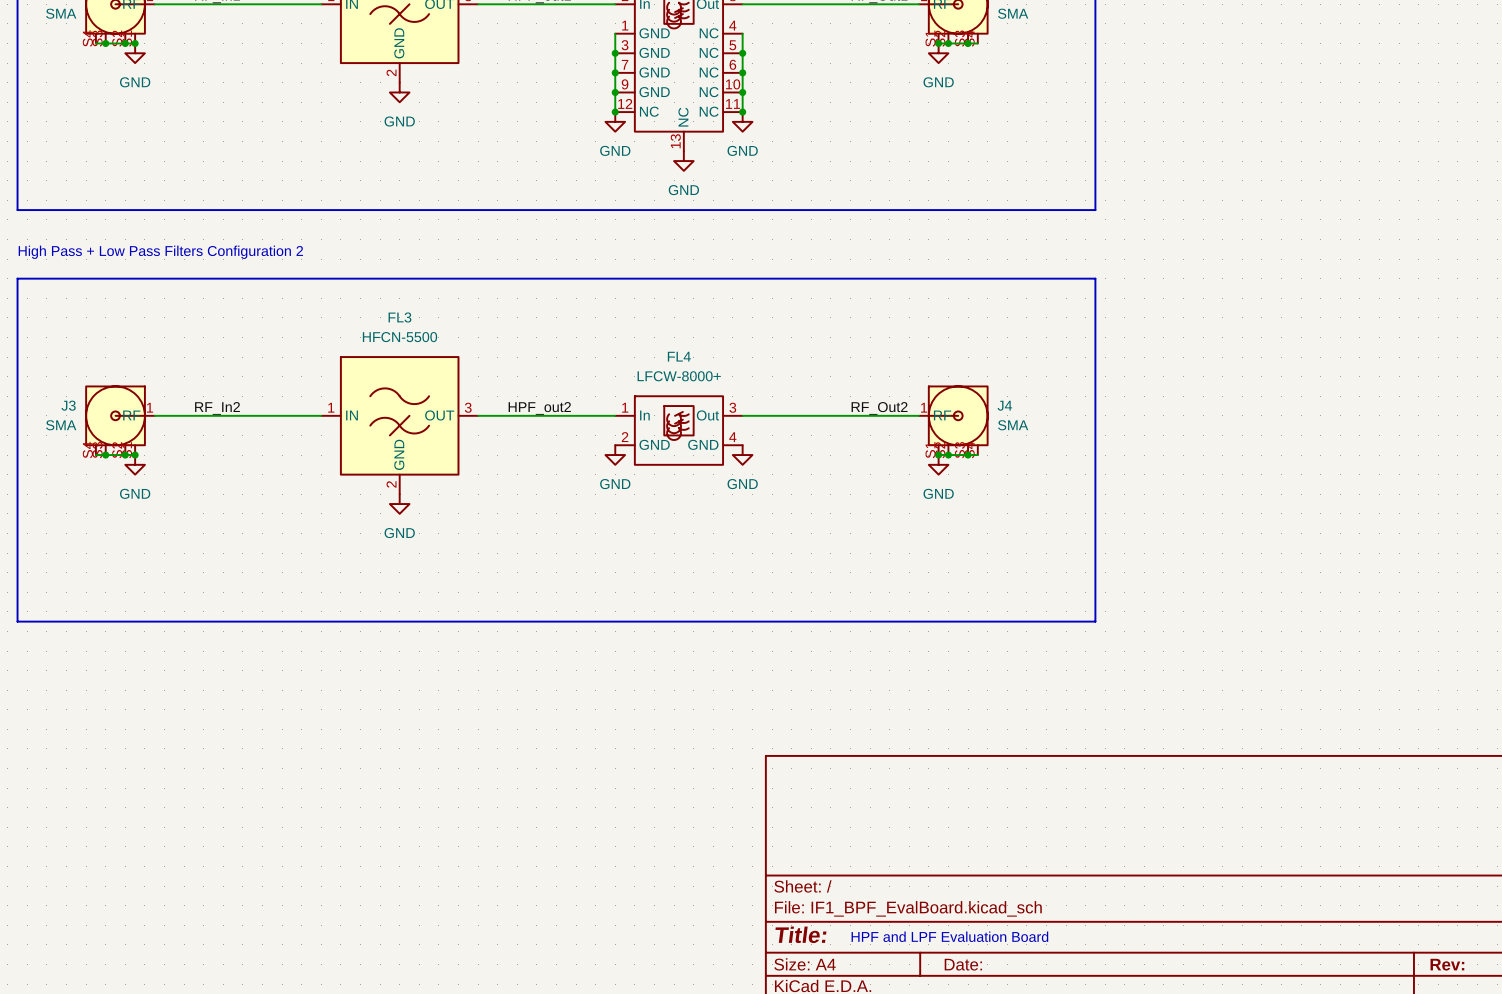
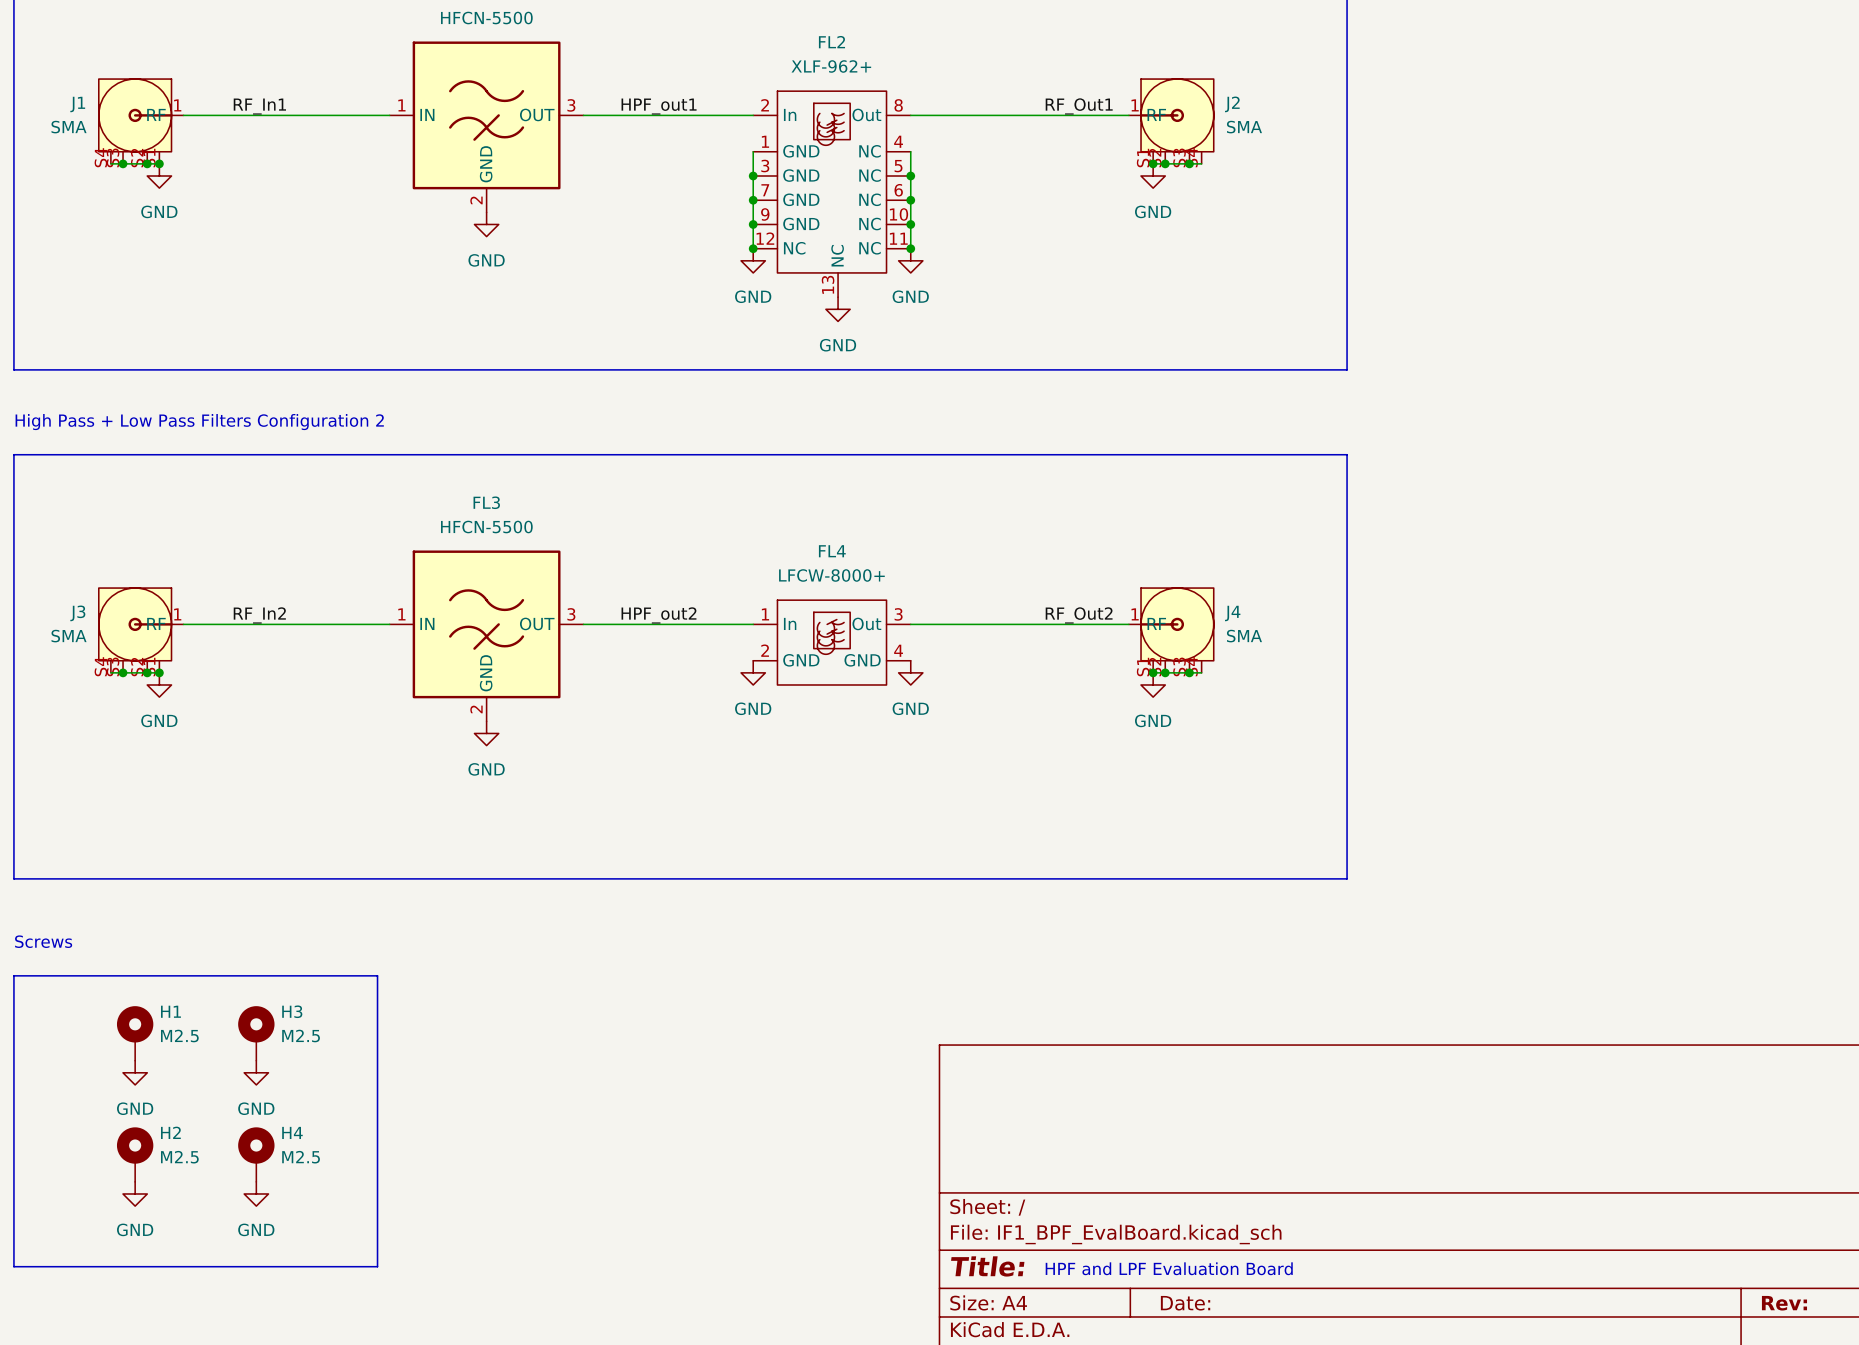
text: none -> Screws (43, 941)
line: none -> (13, 975) (13, 1266) (377, 1266) (377, 975) (13, 975)
H1: none -> M2.5 (135, 1033)
H3: none -> M2.5 (256, 1033)
power symbol: none -> GND (135, 1072)
power symbol: none -> GND (256, 1072)
H2: none -> M2.5 (135, 1154)
H4: none -> M2.5 (256, 1154)
power symbol: none -> GND (135, 1193)
power symbol: none -> GND (256, 1193)

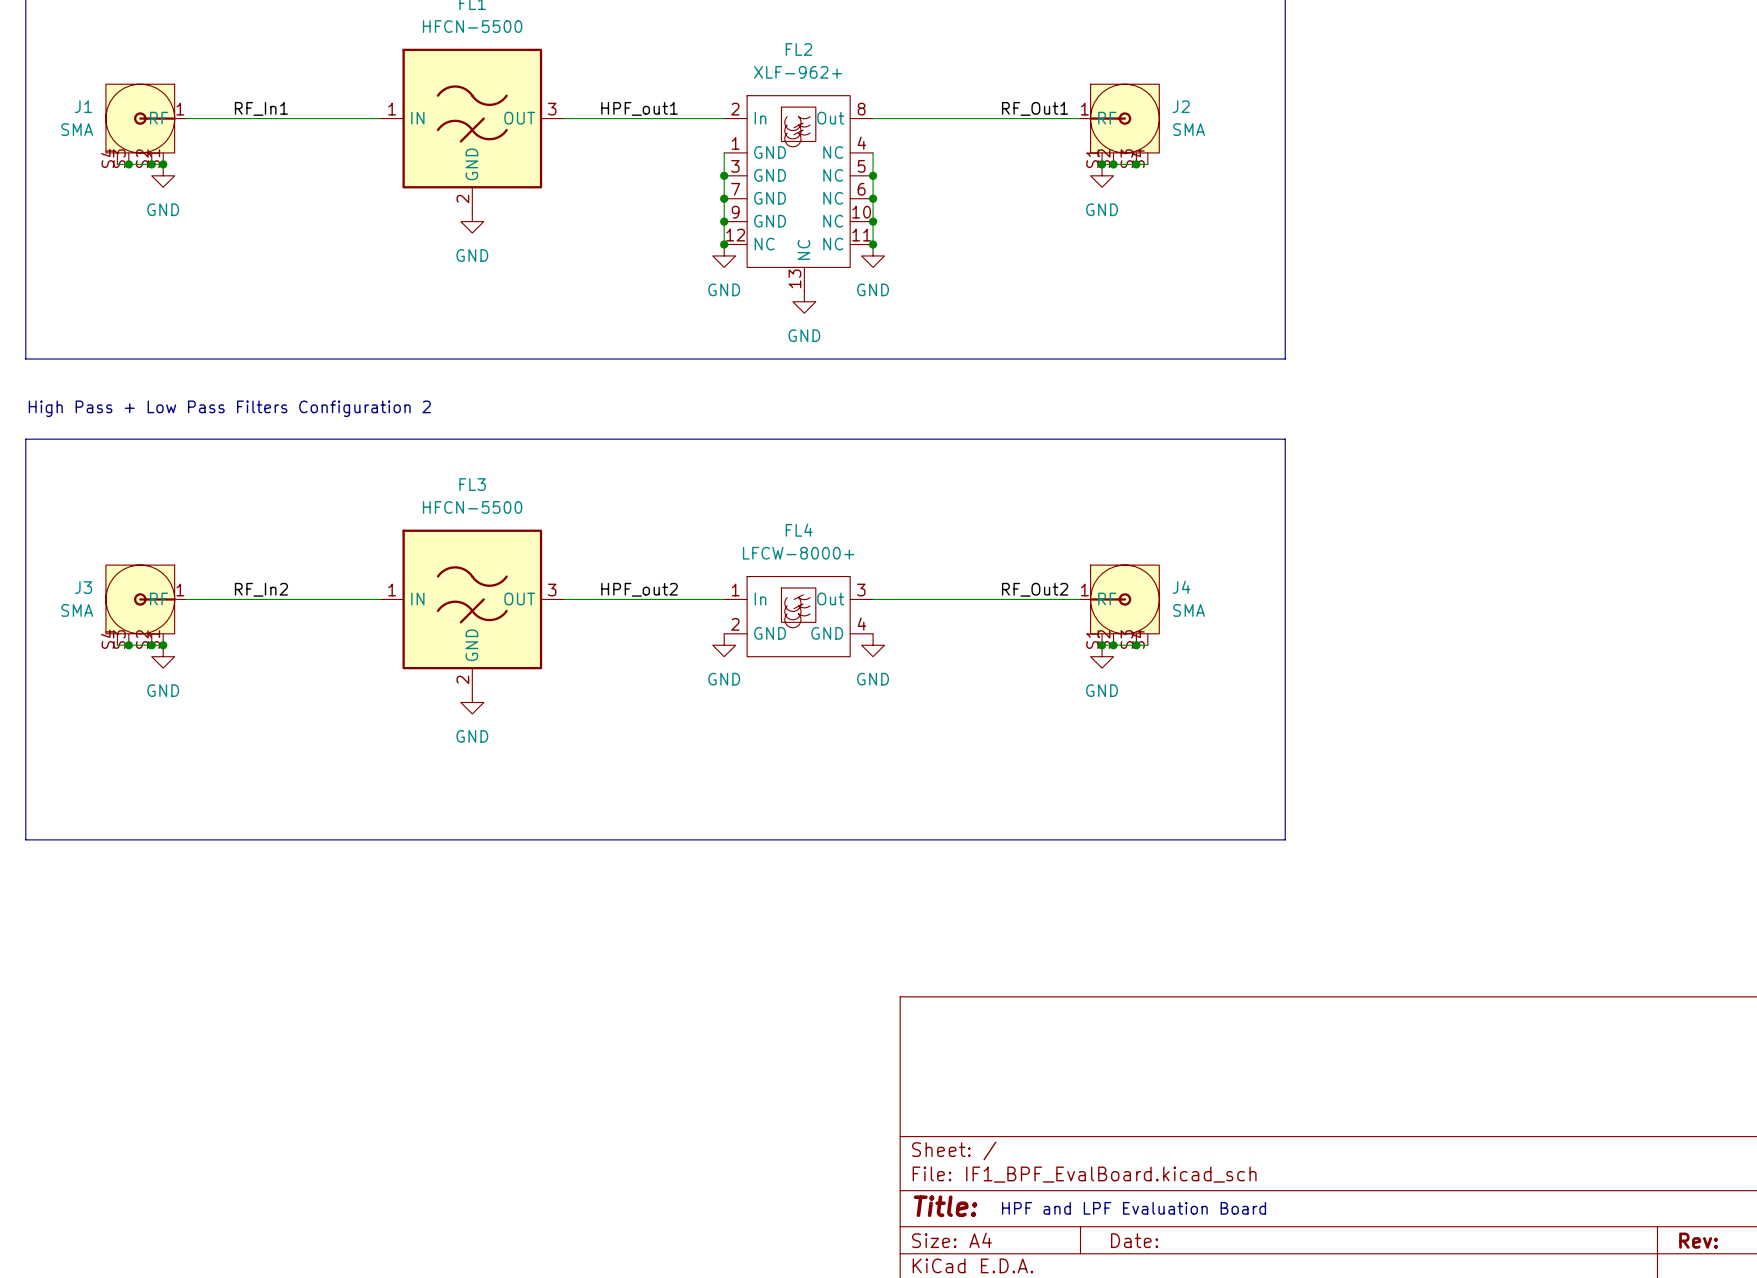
text: Screws (43, 941) -> none
line: (13, 975) (13, 1266) (377, 1266) (377, 975) (13, 975) -> none
H1: M2.5 (135, 1033) -> none
H3: M2.5 (256, 1033) -> none
power symbol: GND (135, 1072) -> none
power symbol: GND (256, 1072) -> none
H2: M2.5 (135, 1154) -> none
H4: M2.5 (256, 1154) -> none
power symbol: GND (135, 1193) -> none
power symbol: GND (256, 1193) -> none

